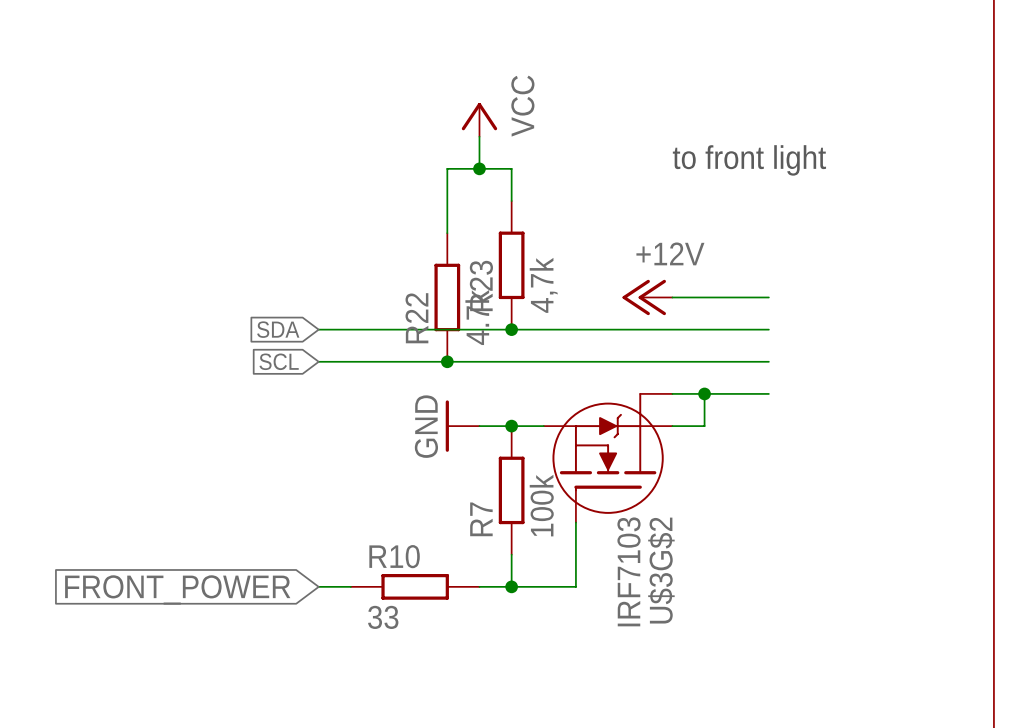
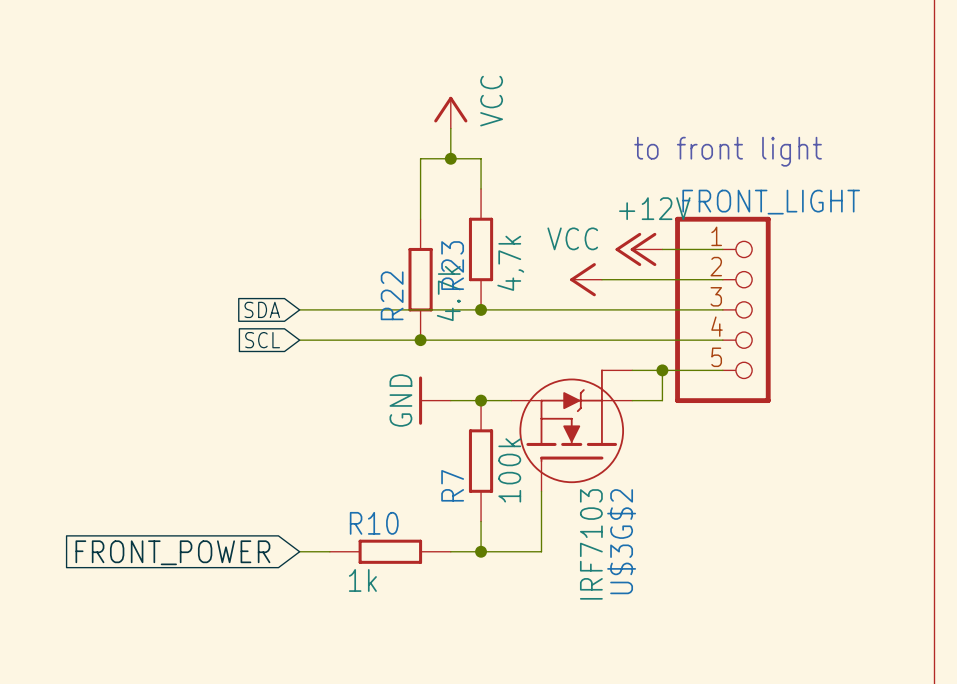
wire: none -> (662, 249) (722, 249)
power symbol: none -> VCC (586, 279)
power symbol position: +12V (647, 297) -> +12V (638, 249)
FRONT_LIGHT: none -> (722, 309)
R10 value: 33 (383, 617) -> 1k (362, 580)

